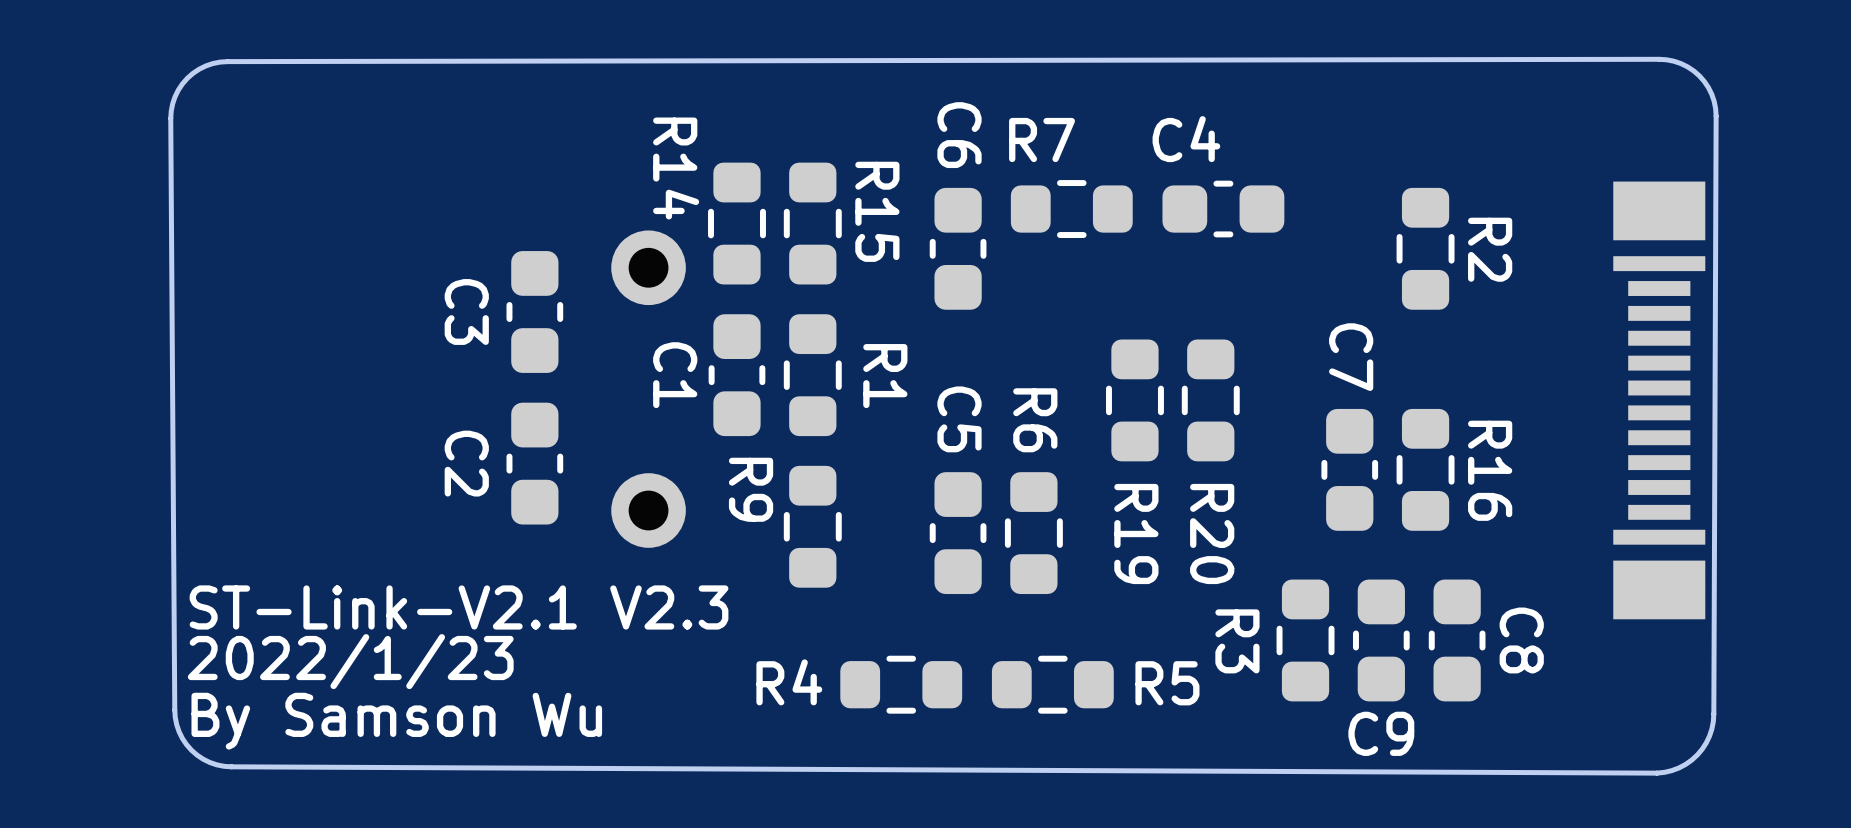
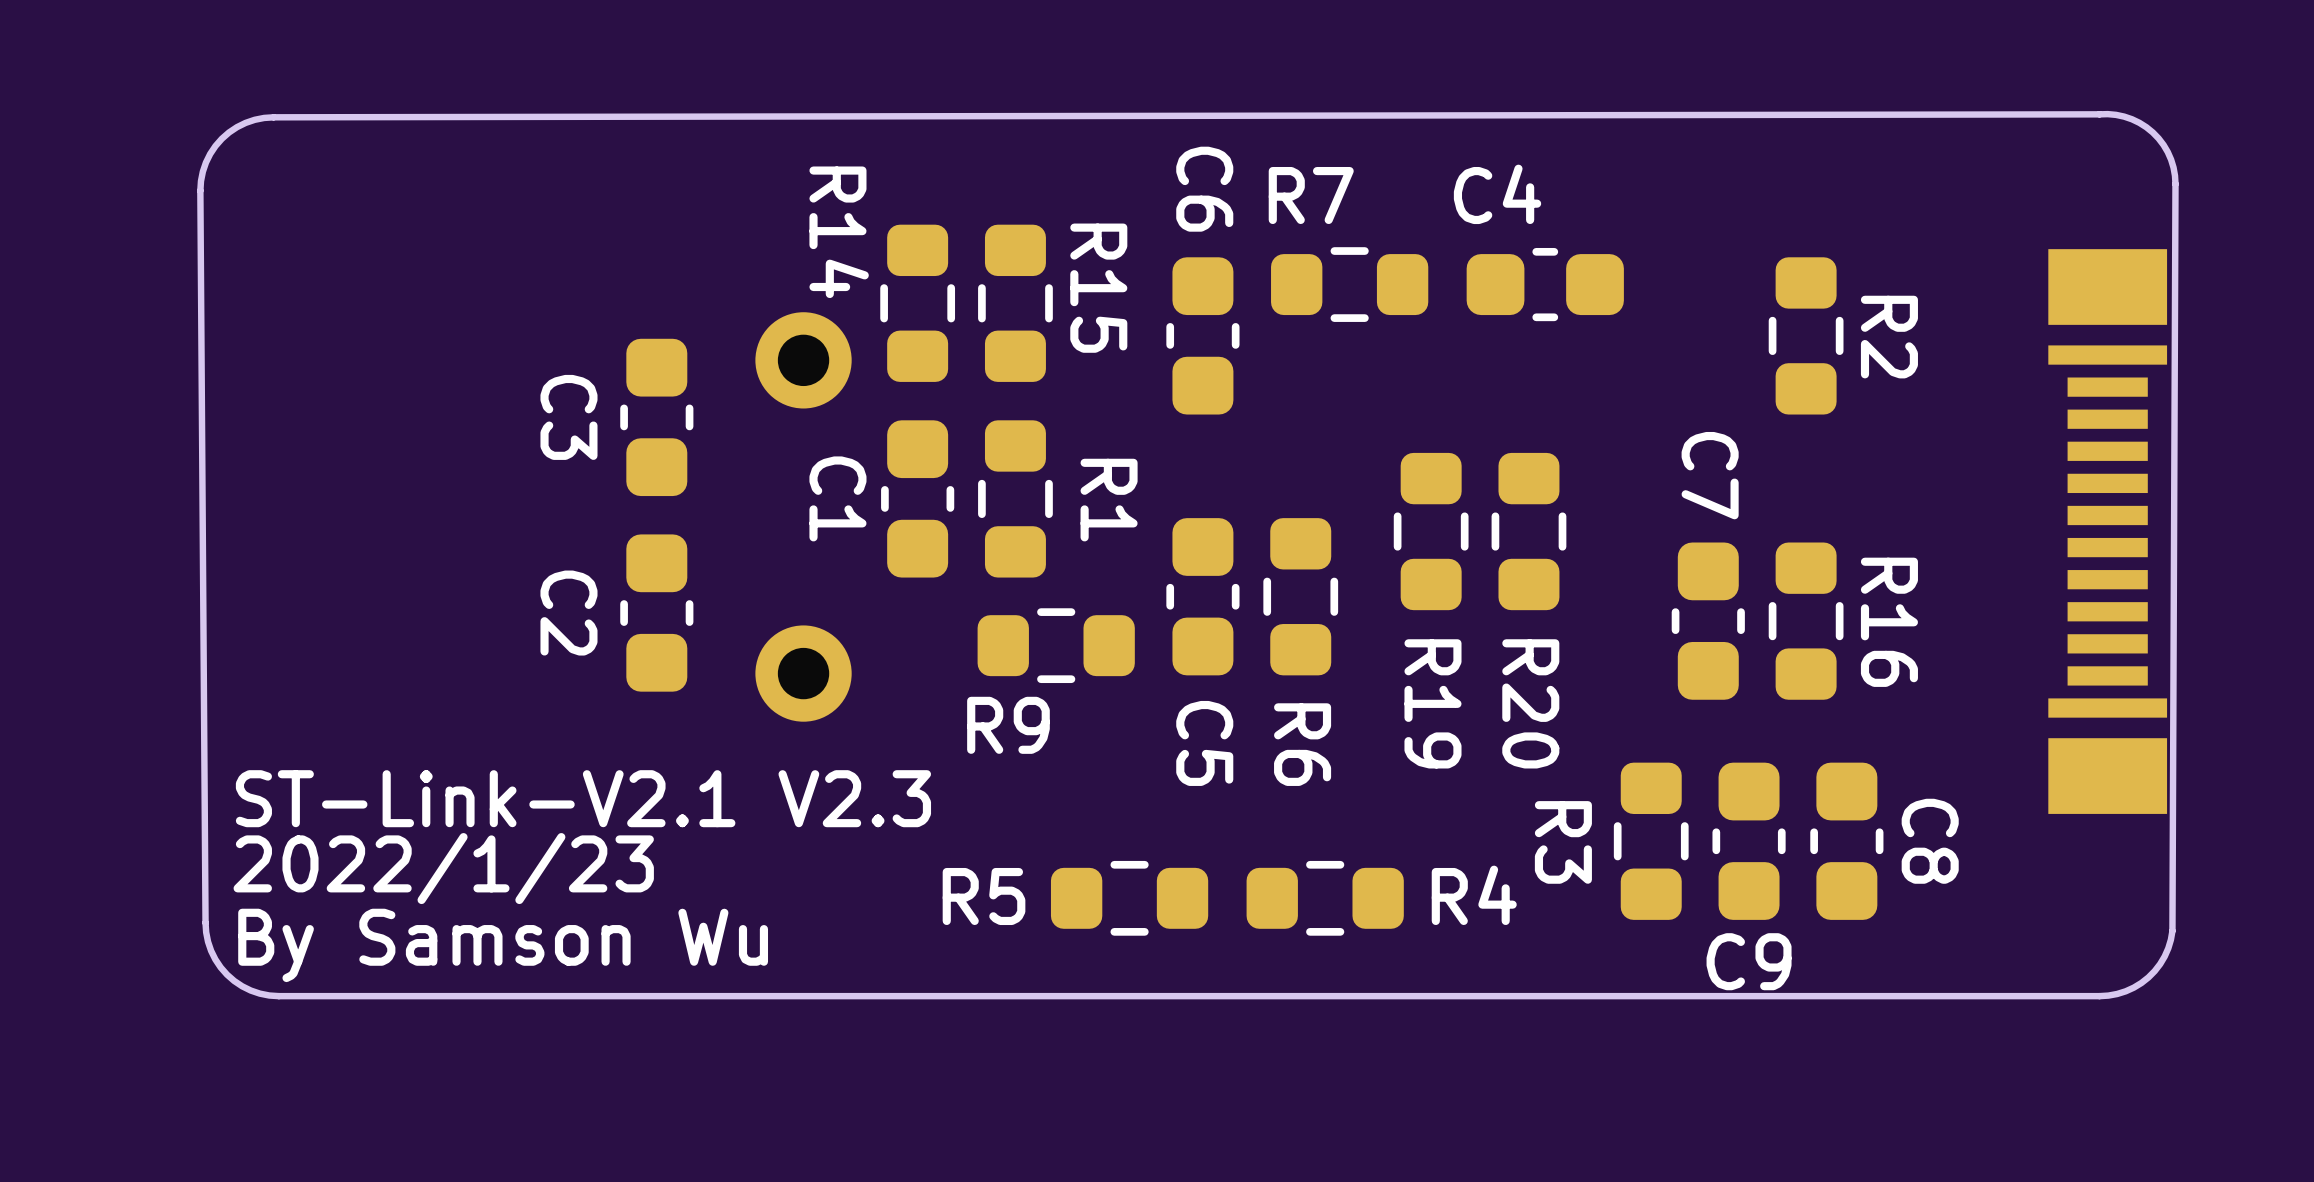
board edge: (1659, 59) (227, 61) (205, 65) (192, 73) (182, 83) (175, 96) (170, 118) (174, 709) (179, 731) (186, 744) (197, 755) (209, 762) (231, 766) (1656, 773) (1678, 767) (1691, 760) (1706, 742) (1711, 728) (1713, 713) (1716, 116) (1711, 94) (1699, 75) (1681, 63) (1659, 59) -> (2099, 114) (2116, 114) (2131, 119) (2152, 132) (2163, 145) (2171, 159) (2175, 184) (2172, 930) (2168, 948) (2160, 964) (2141, 982) (2125, 991) (2099, 996) (278, 996) (250, 990) (234, 980) (220, 967) (211, 950) (205, 922) (200, 190) (205, 162) (215, 146) (229, 132) (245, 122) (273, 117) (2099, 114)
C5 name position: C5 (959, 419) -> C5 (1204, 743)
R6 name position: R6 (1035, 420) -> R6 (1302, 744)
R9 name position: R9 (751, 489) -> R9 (1008, 725)
R9 rotation: 0° (812, 526) -> 90° clockwise (1056, 645)
C5 position: (958, 533) -> (1202, 596)
R6 position: (1033, 533) -> (1300, 596)
text position: ST-Link-V2.1 V2.3 (459, 607) -> ST-Link-V2.1 V2.3 (583, 798)
text position: 2022/1/23 (350, 661) -> 2022/1/23 (443, 868)
R4 name: R4 (789, 682) -> R5 (984, 896)
R5 name: R5 (1167, 683) -> R4 (1474, 895)
text position: By Samson Wu (396, 721) -> By Samson Wu (503, 945)

